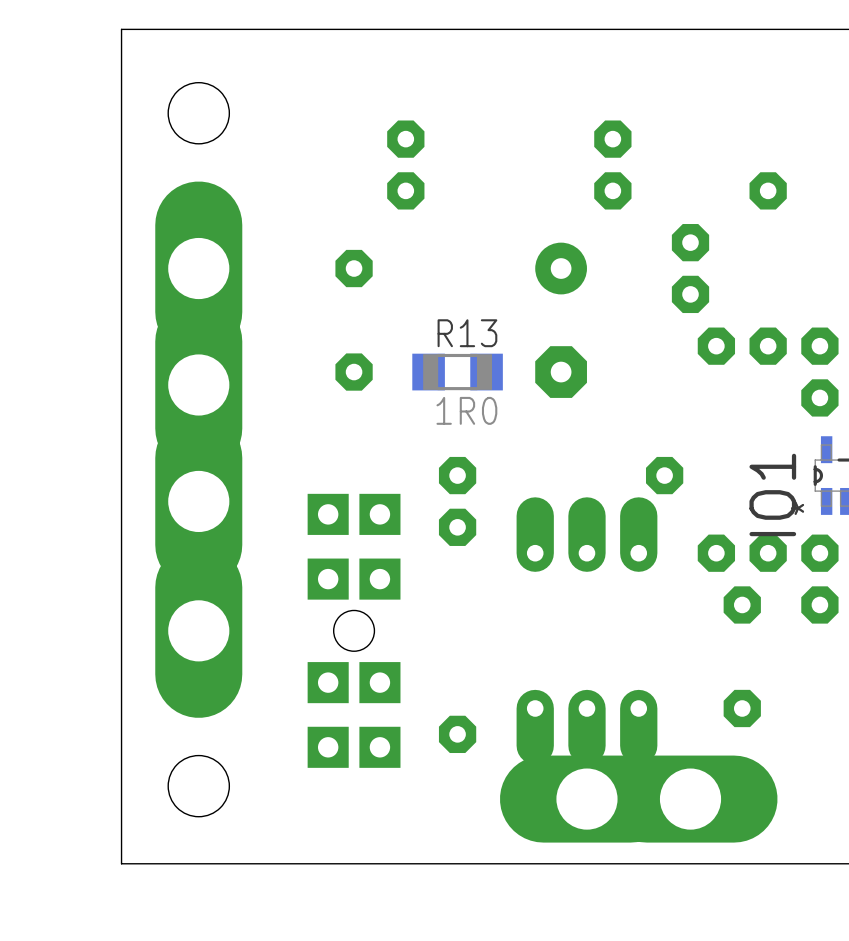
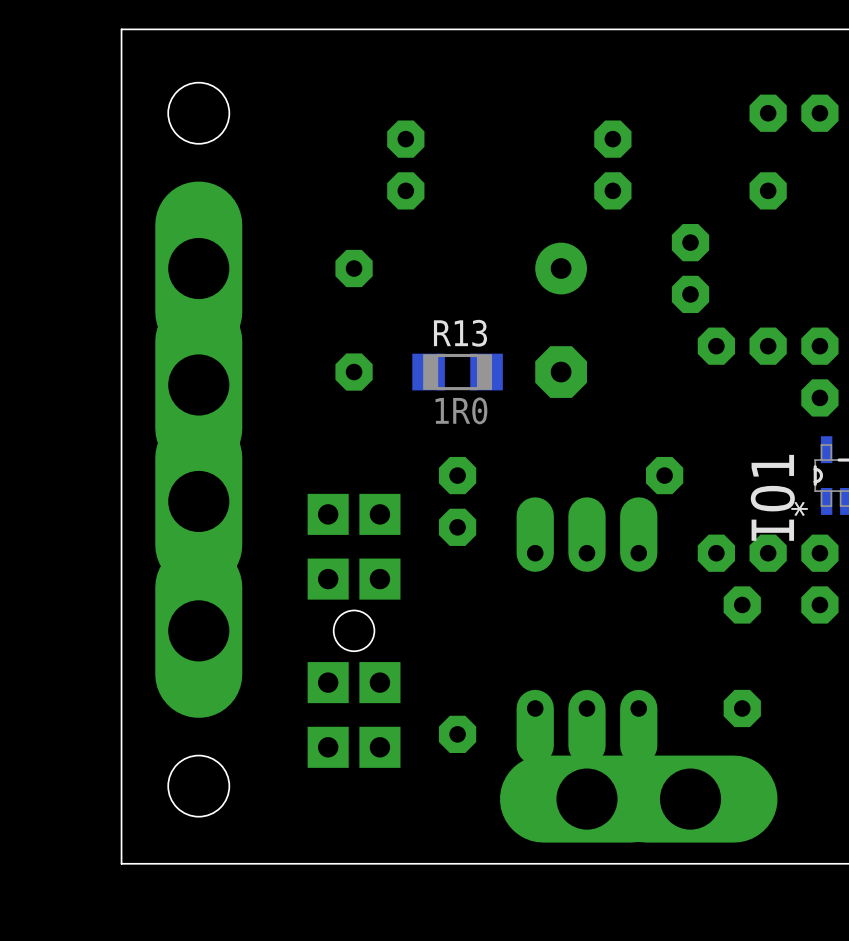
part: none -> (794, 113)

